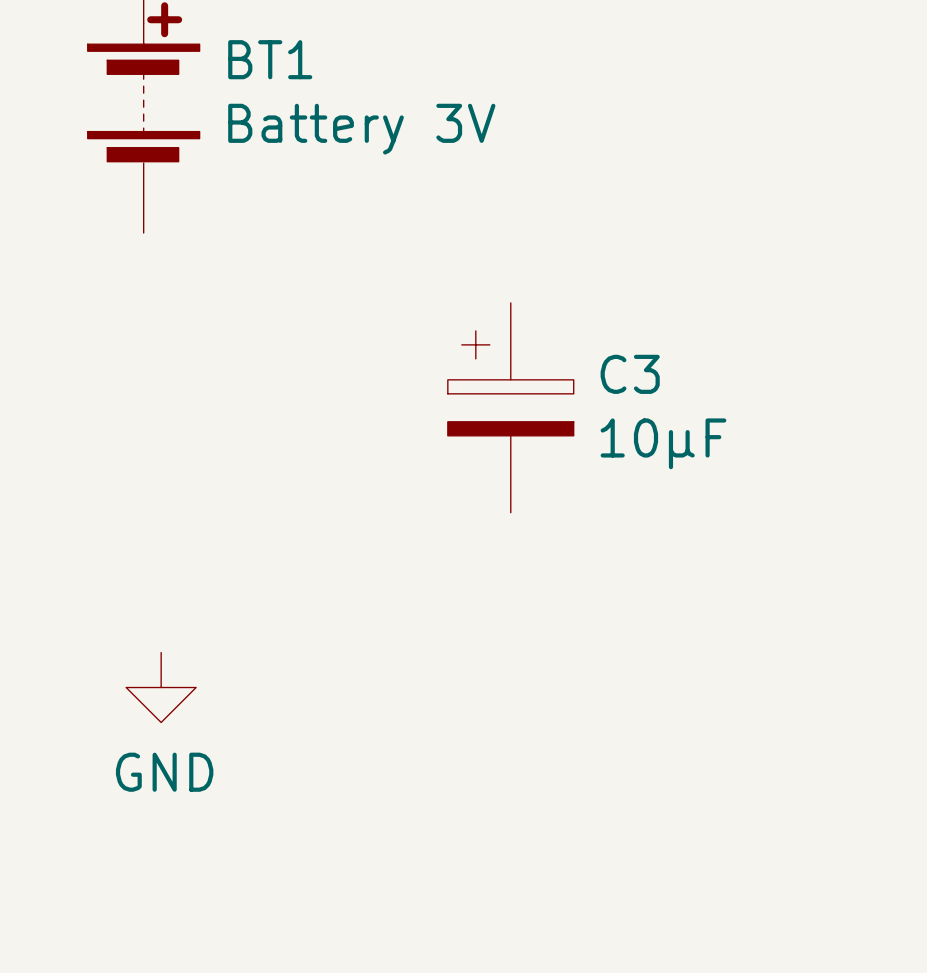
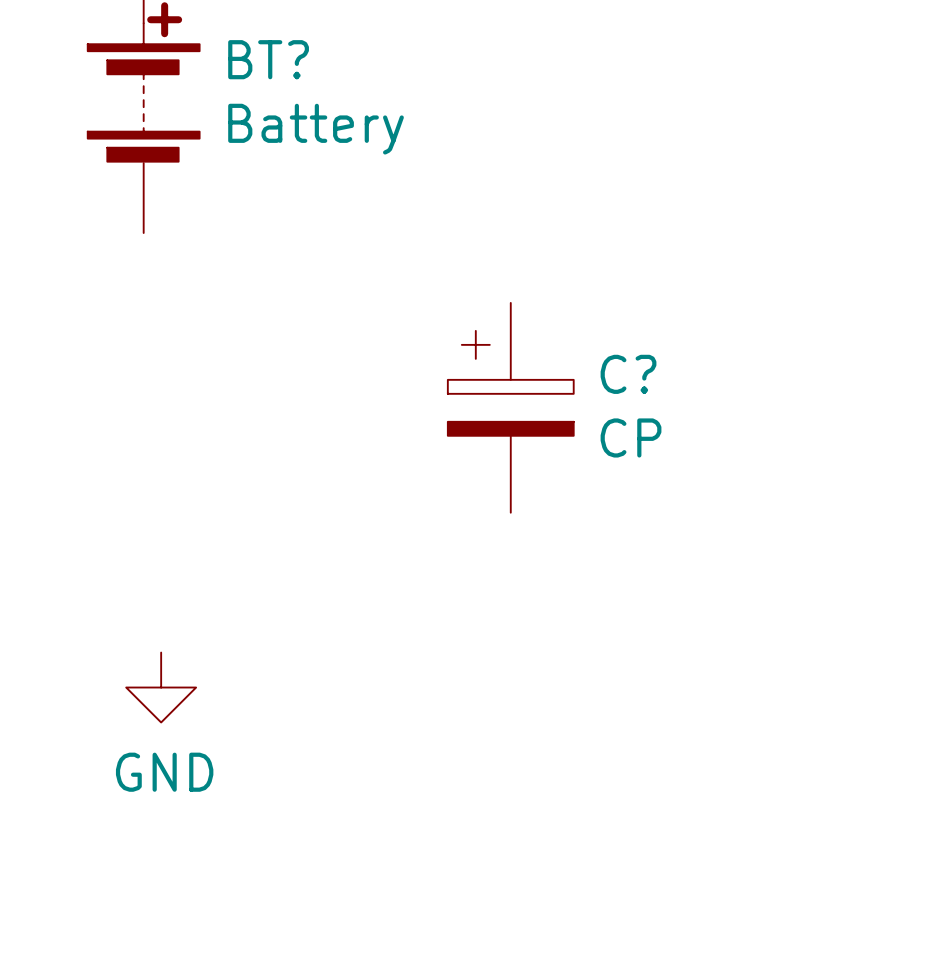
BT1 name: BT1 (270, 59) -> BT? (268, 59)
BT1 value: Battery 3V (361, 129) -> Battery (316, 129)
C3 name: C3 (630, 374) -> C? (628, 374)
C3 value: 10µF (663, 443) -> CP (631, 437)

